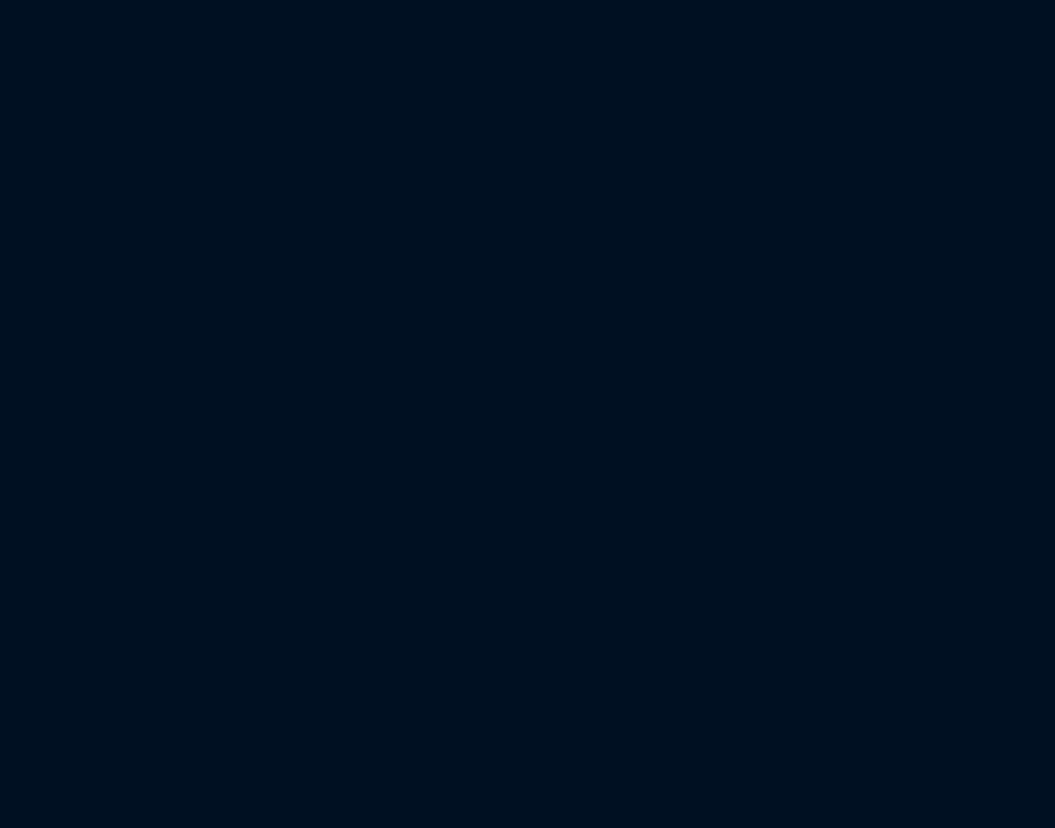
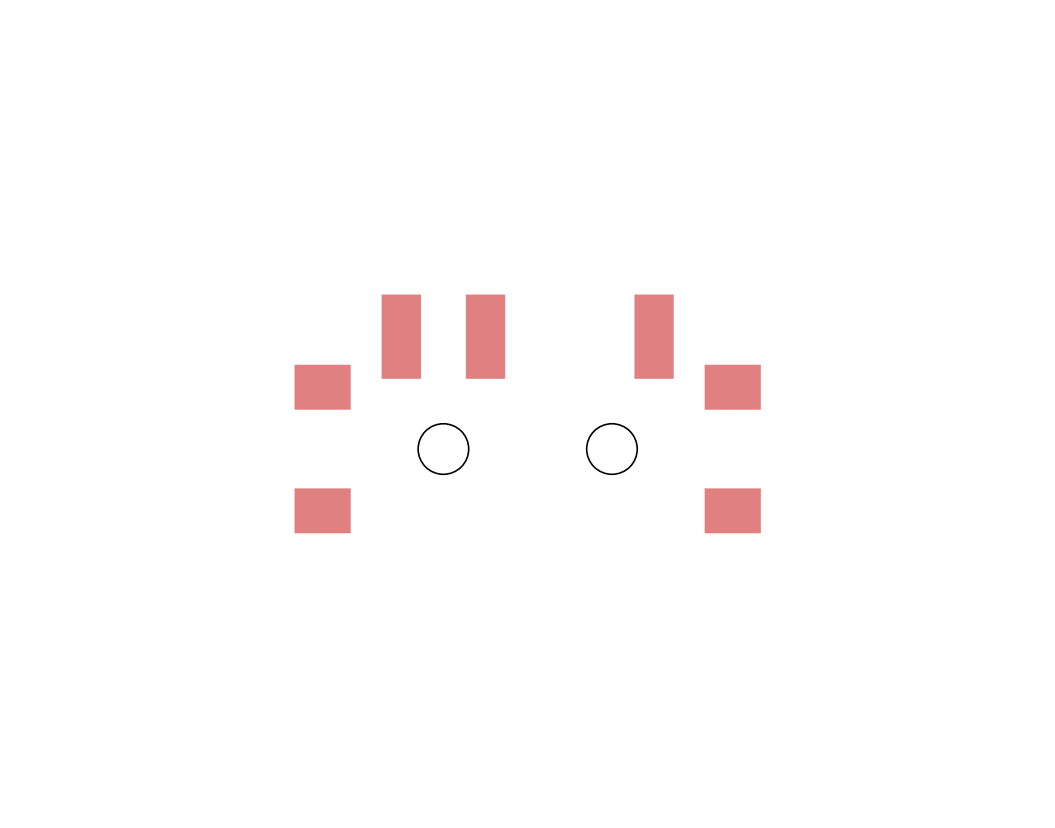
part: none -> (527, 413)

